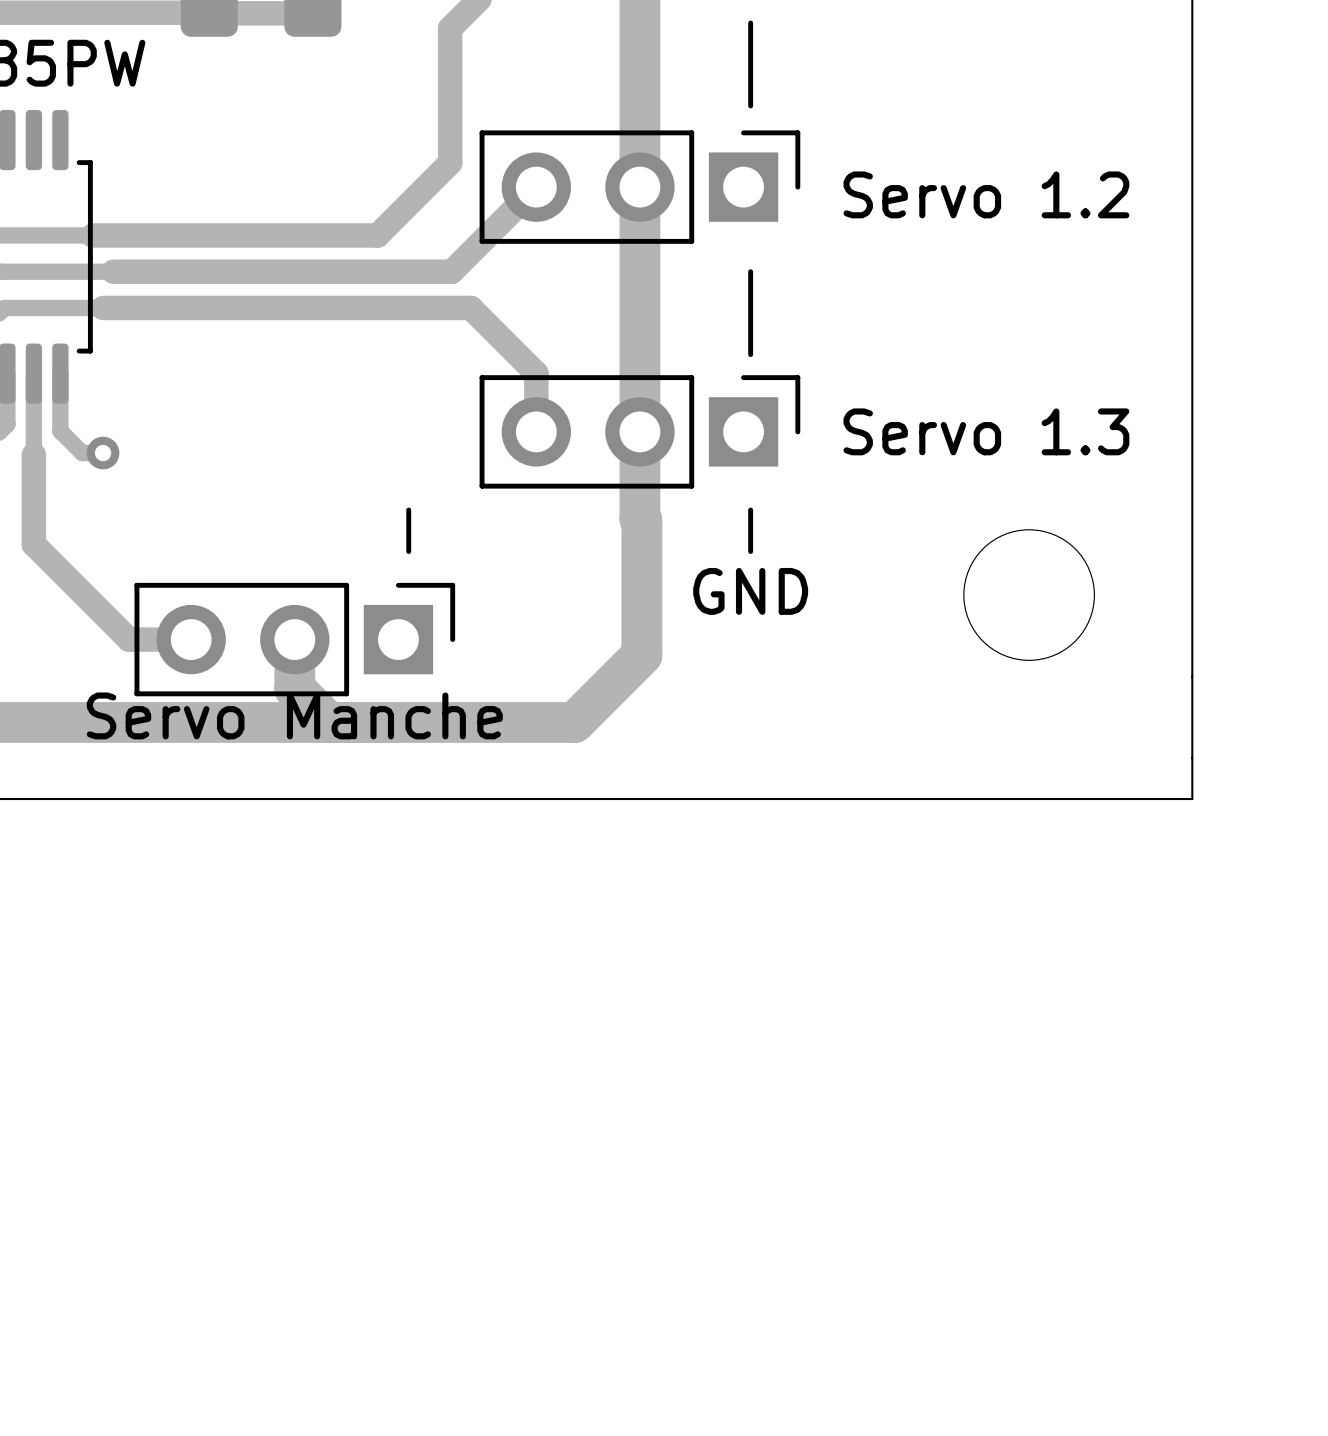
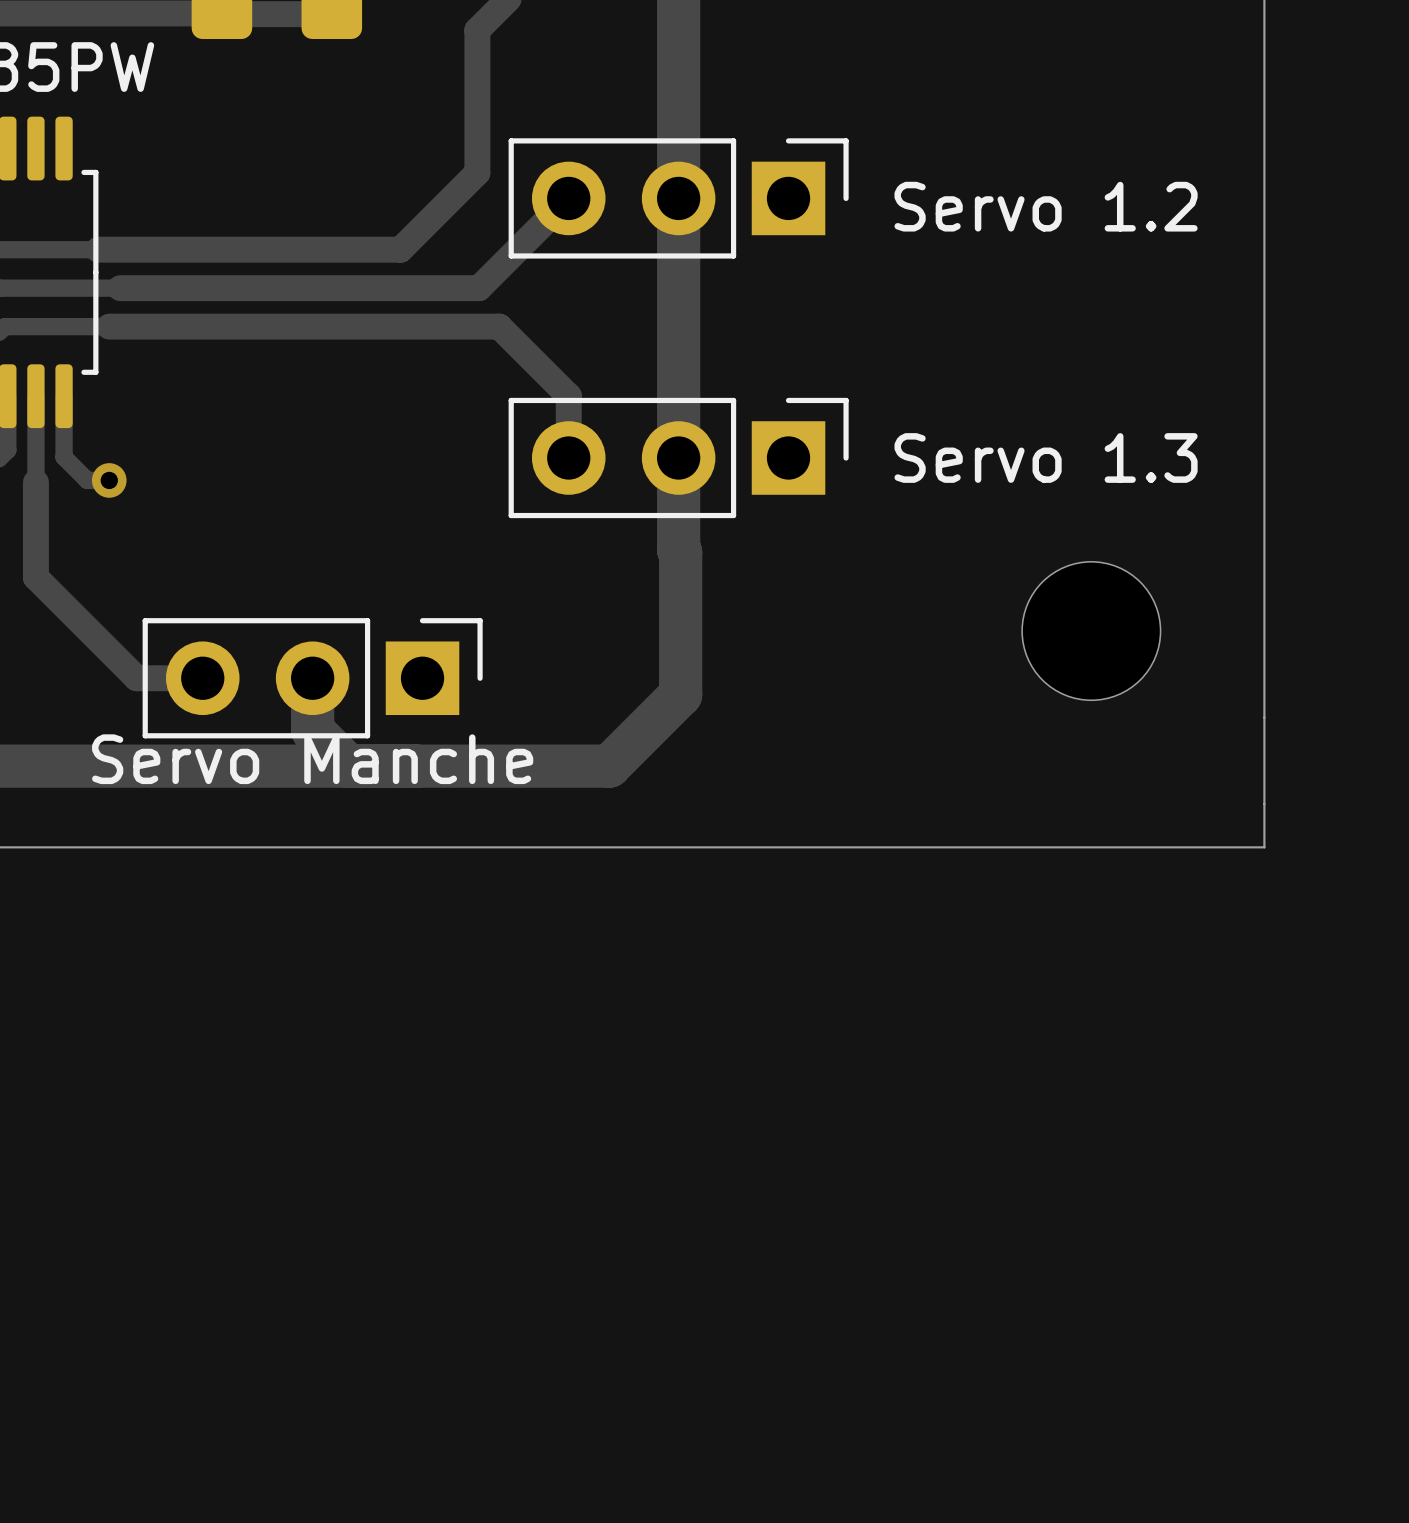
line: (750, 23) (750, 105) -> none
line: (750, 271) (750, 354) -> none
line: (408, 510) (408, 551) -> none
line: (750, 510) (750, 551) -> none
text: GND (750, 591) -> none

